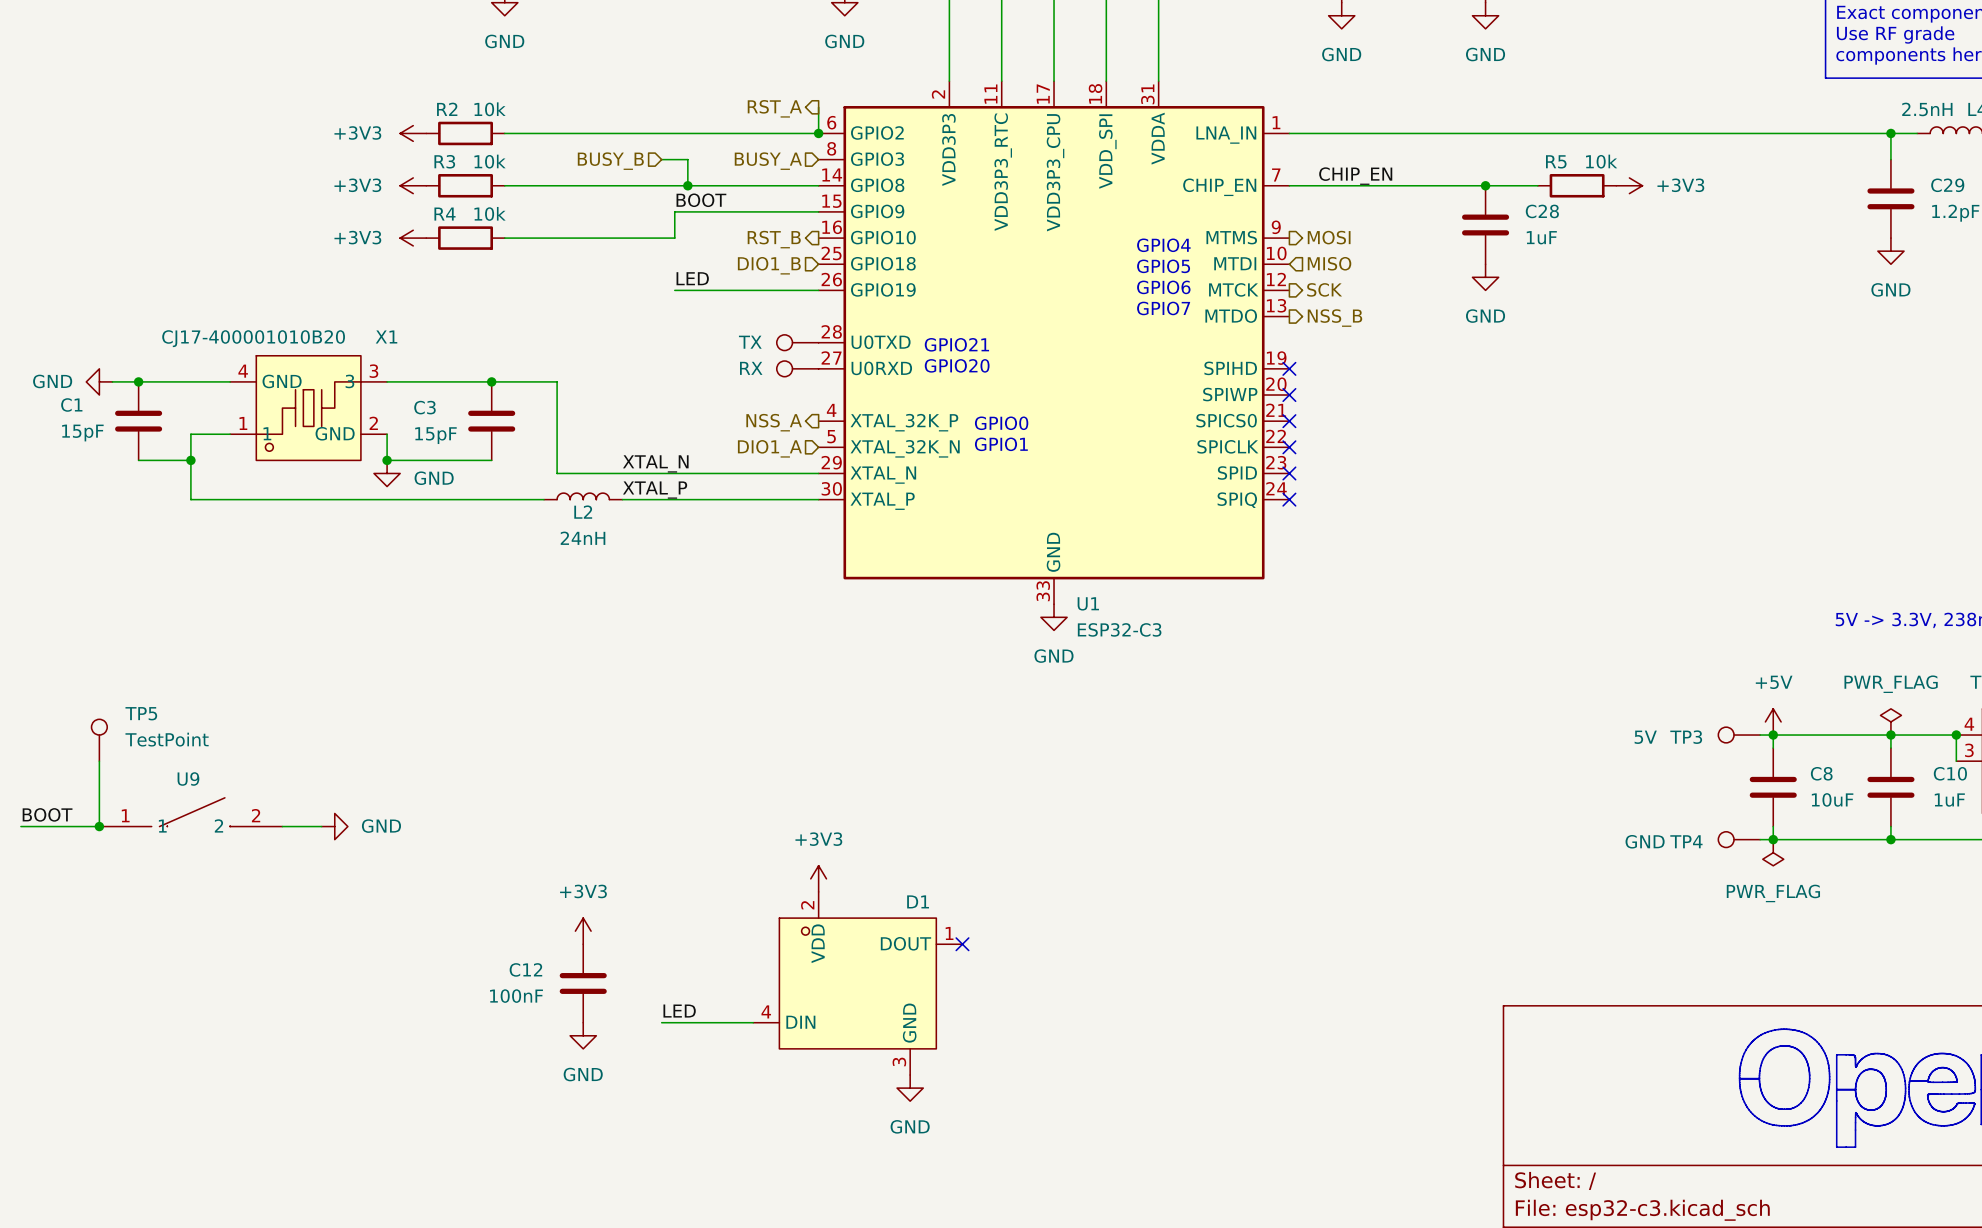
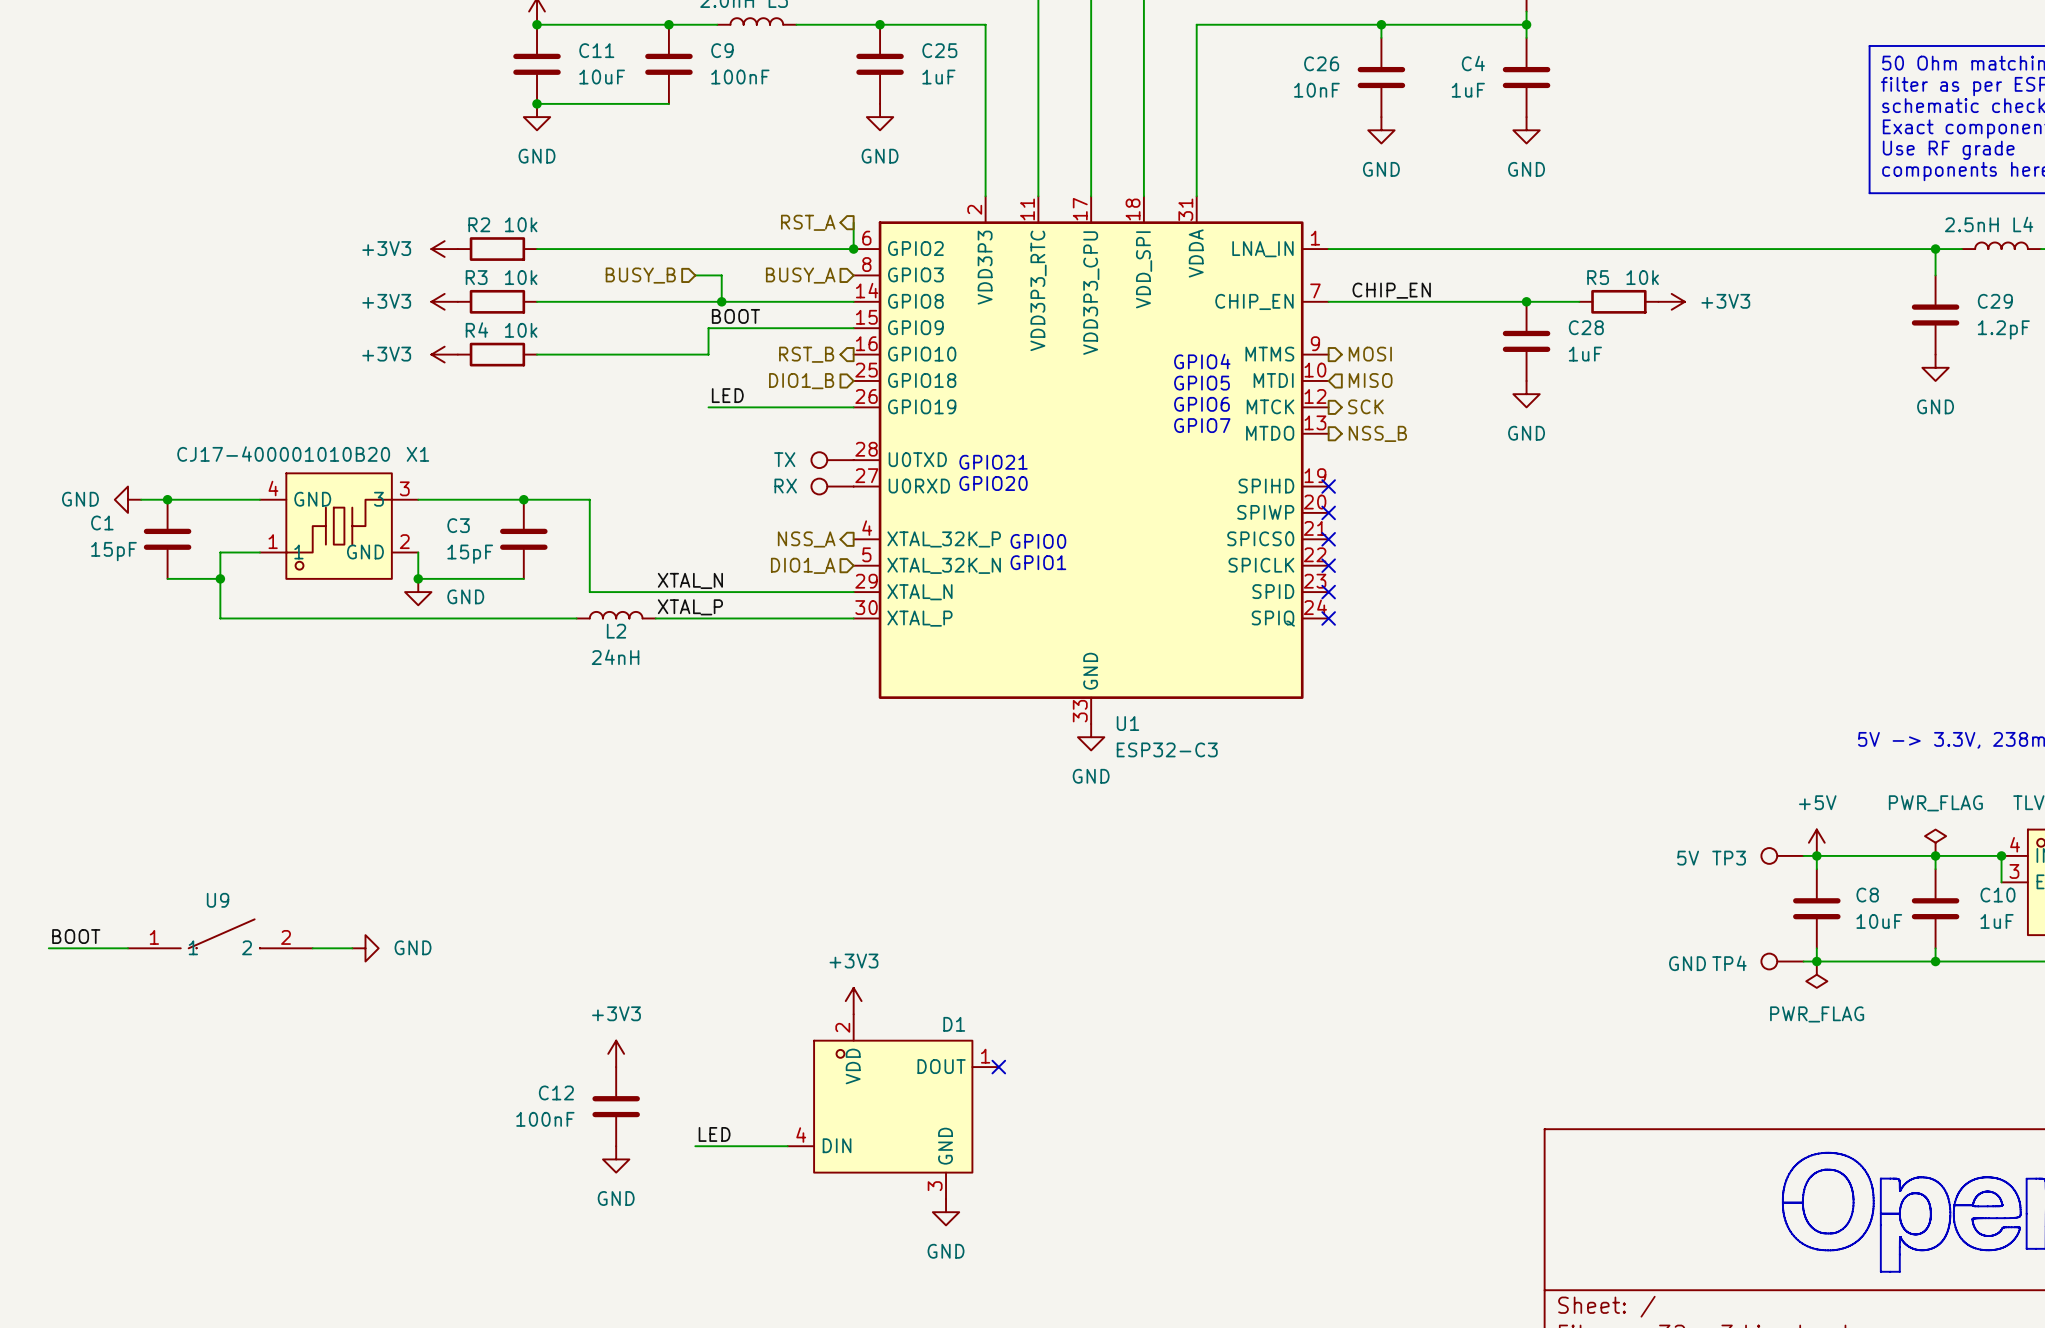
TP5: TestPoint (99, 740) -> none
wire: (99, 761) (99, 826) -> none
junction: (99, 826) -> none

